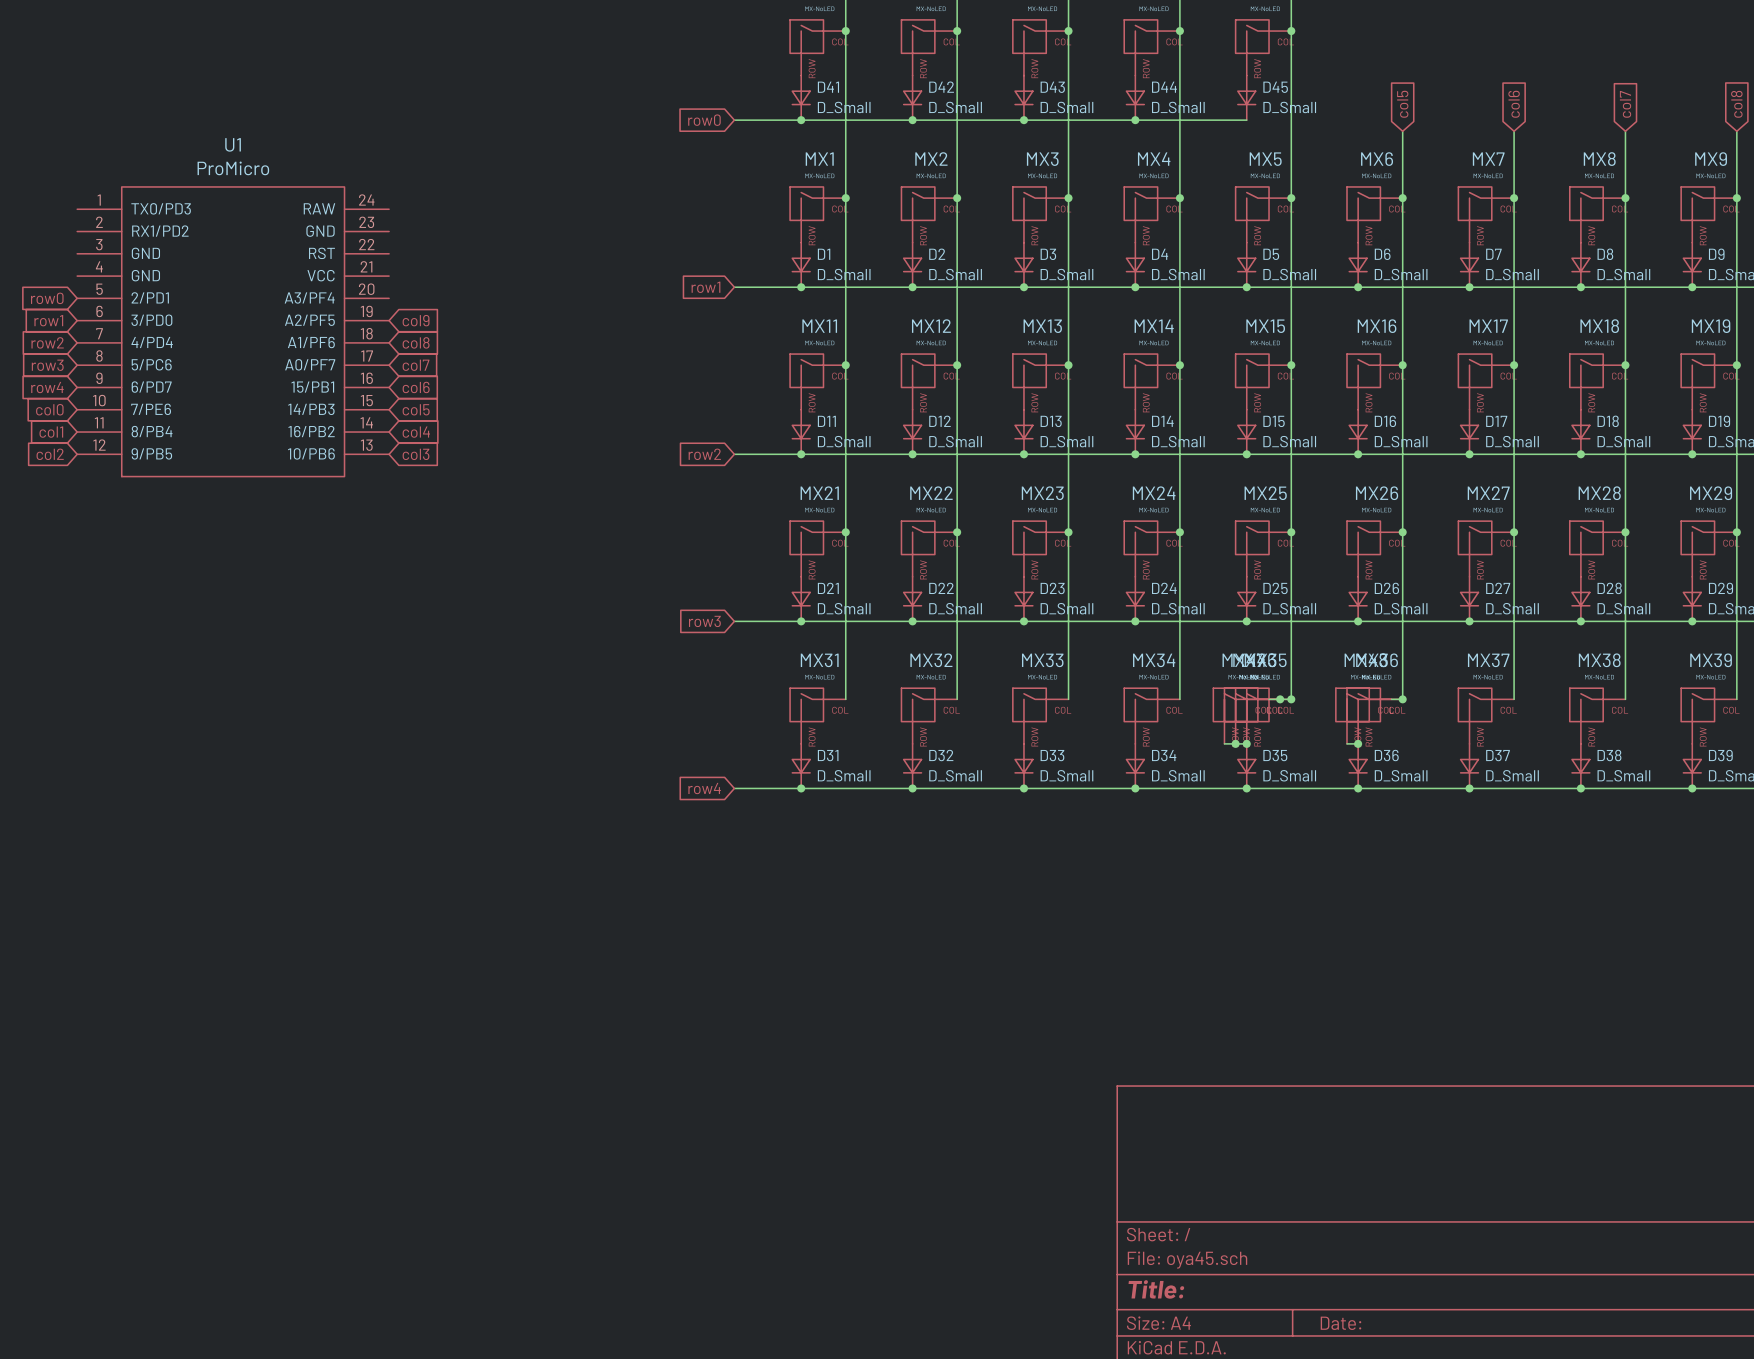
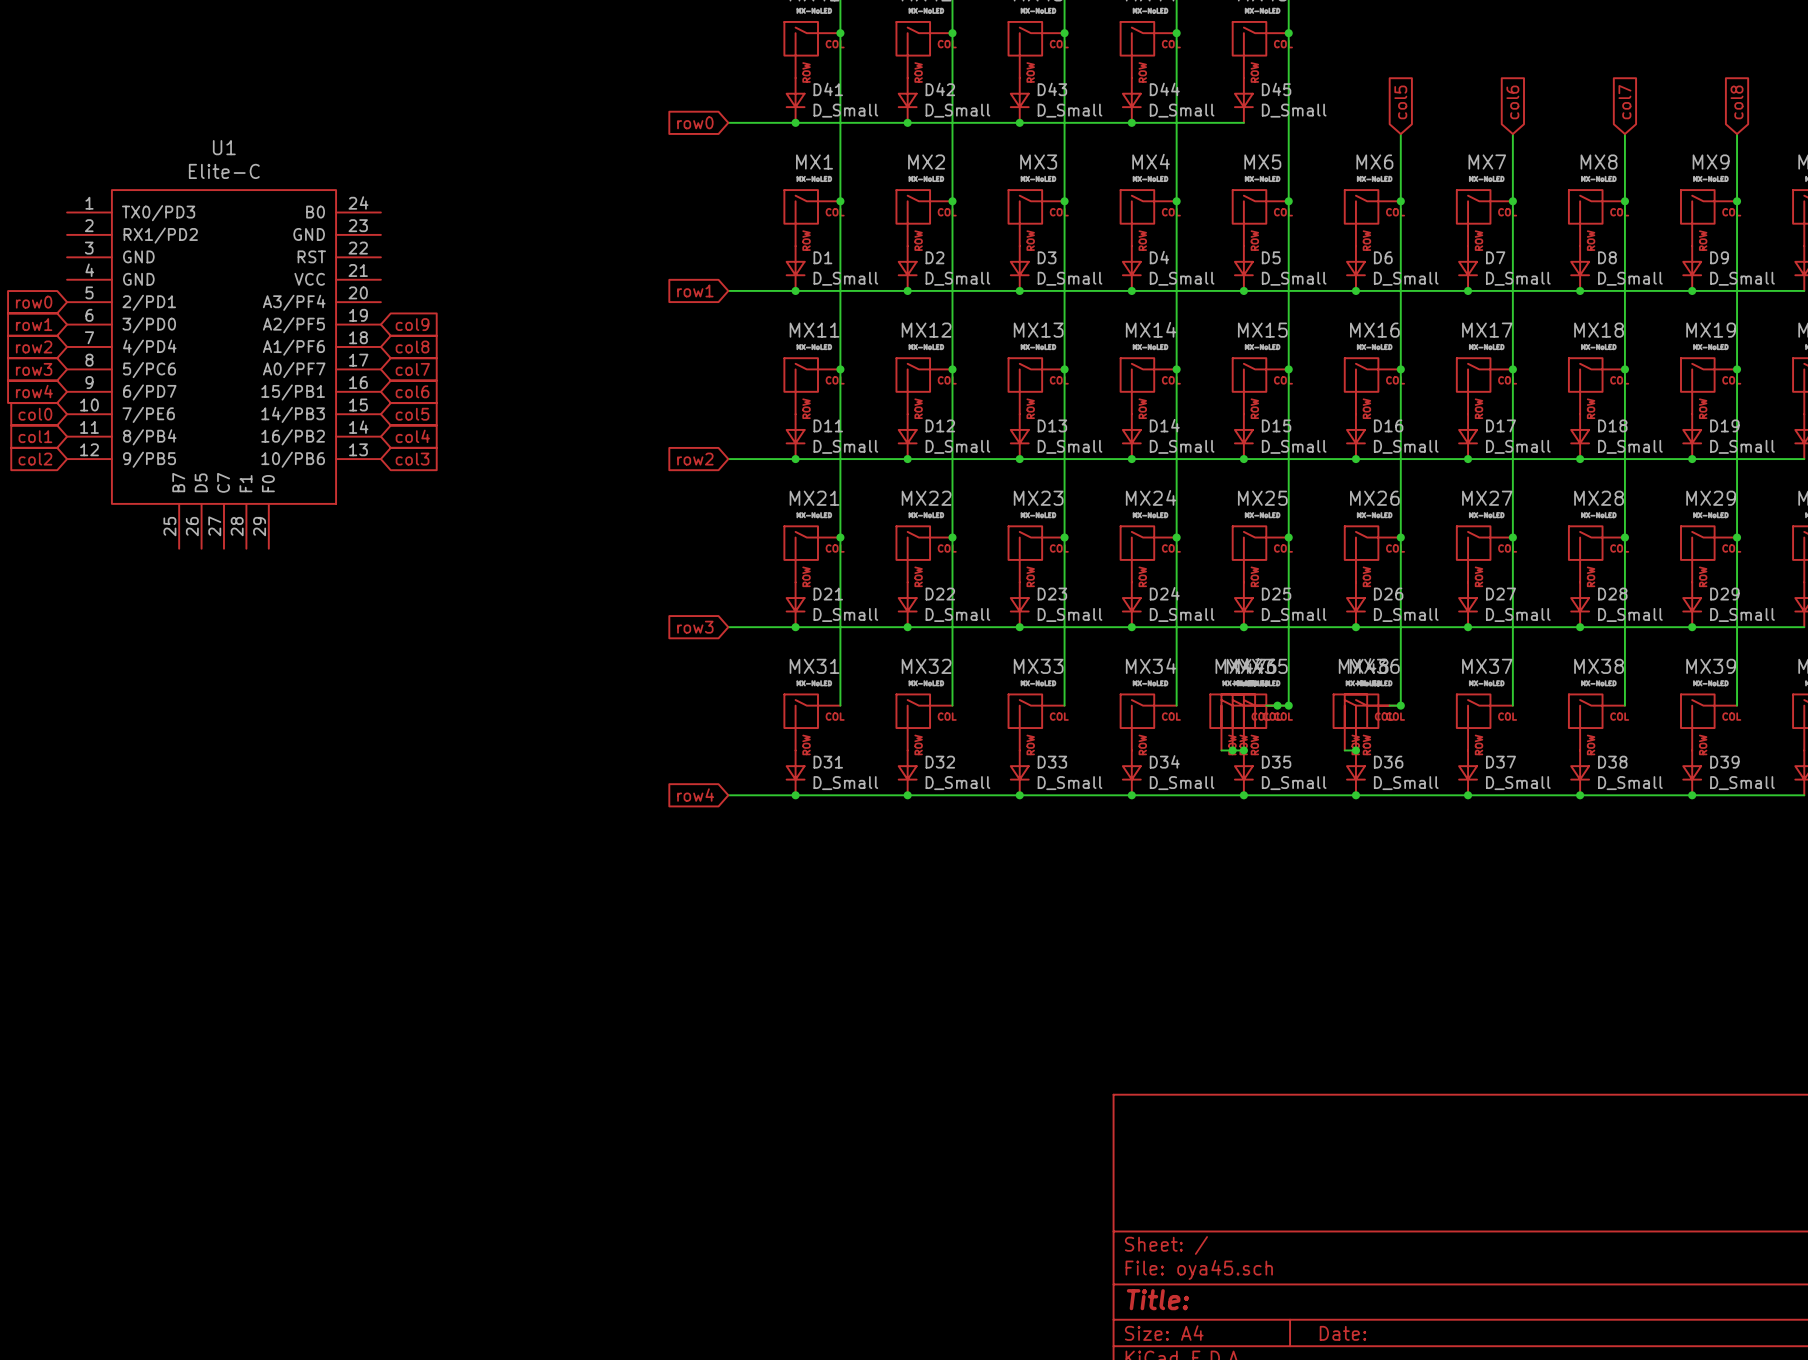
U1 value: ProMicro (233, 168) -> Elite-C (224, 171)
U1 symbol: [77, 186, 390, 477] -> [67, 190, 381, 549]

